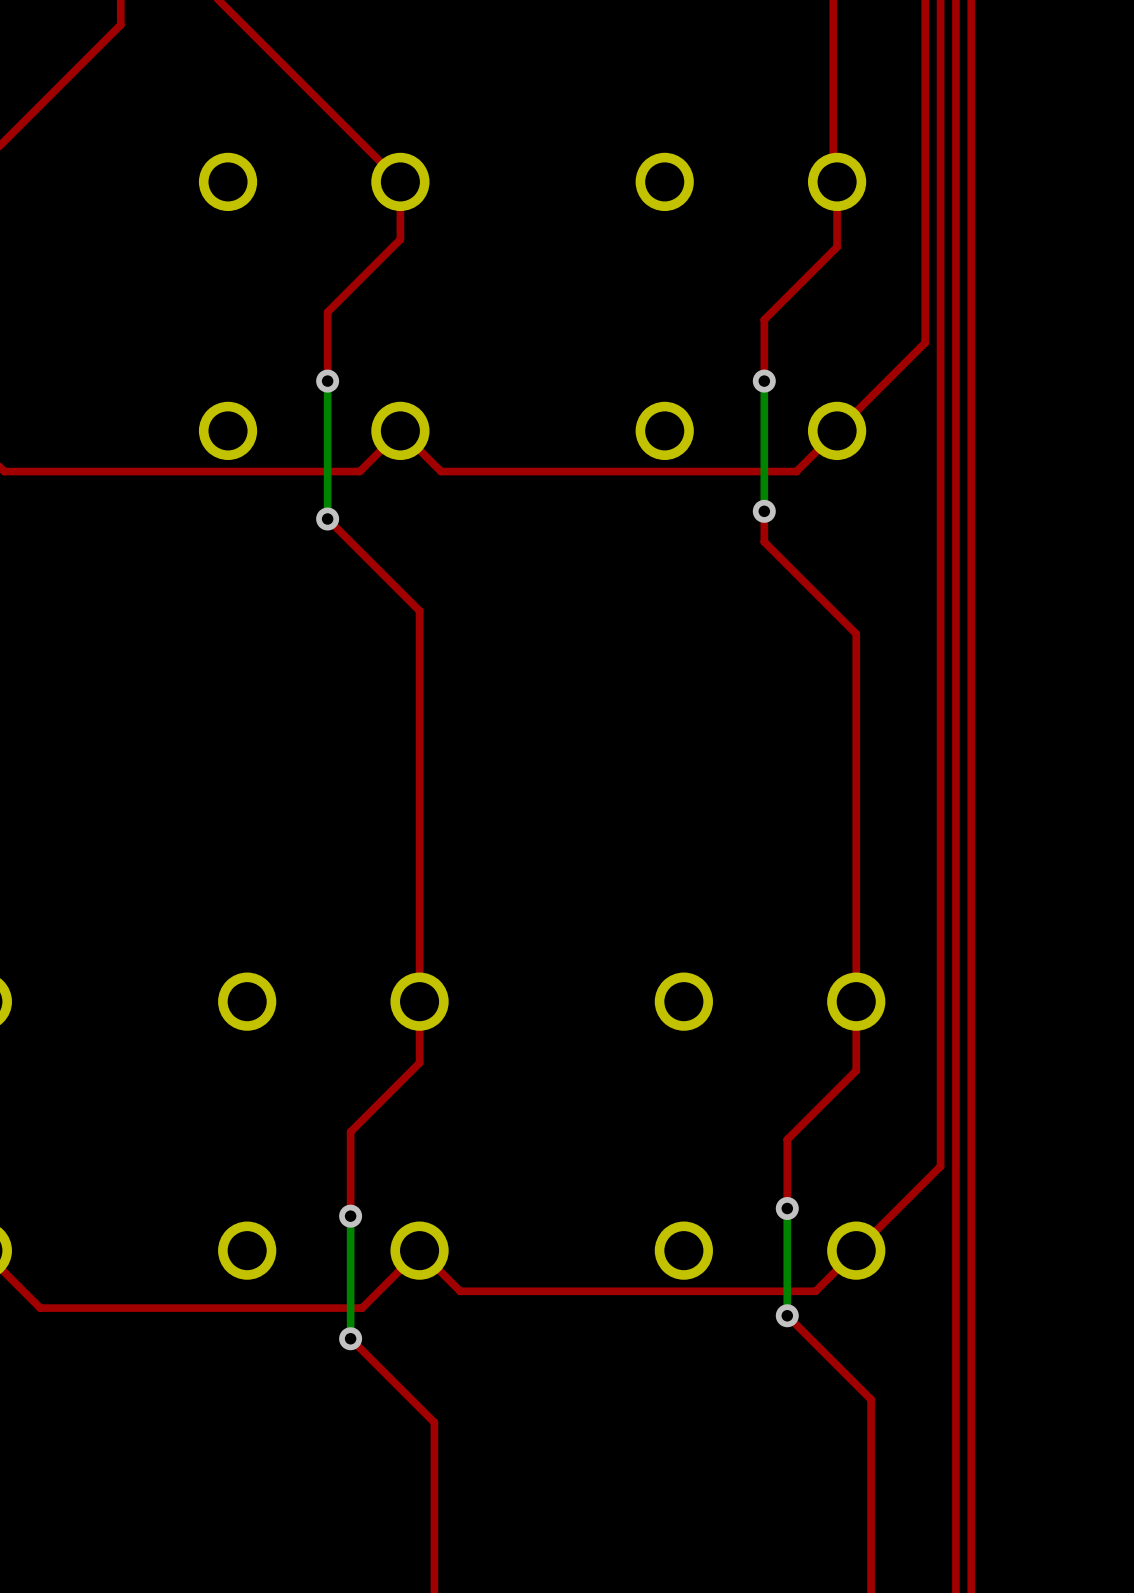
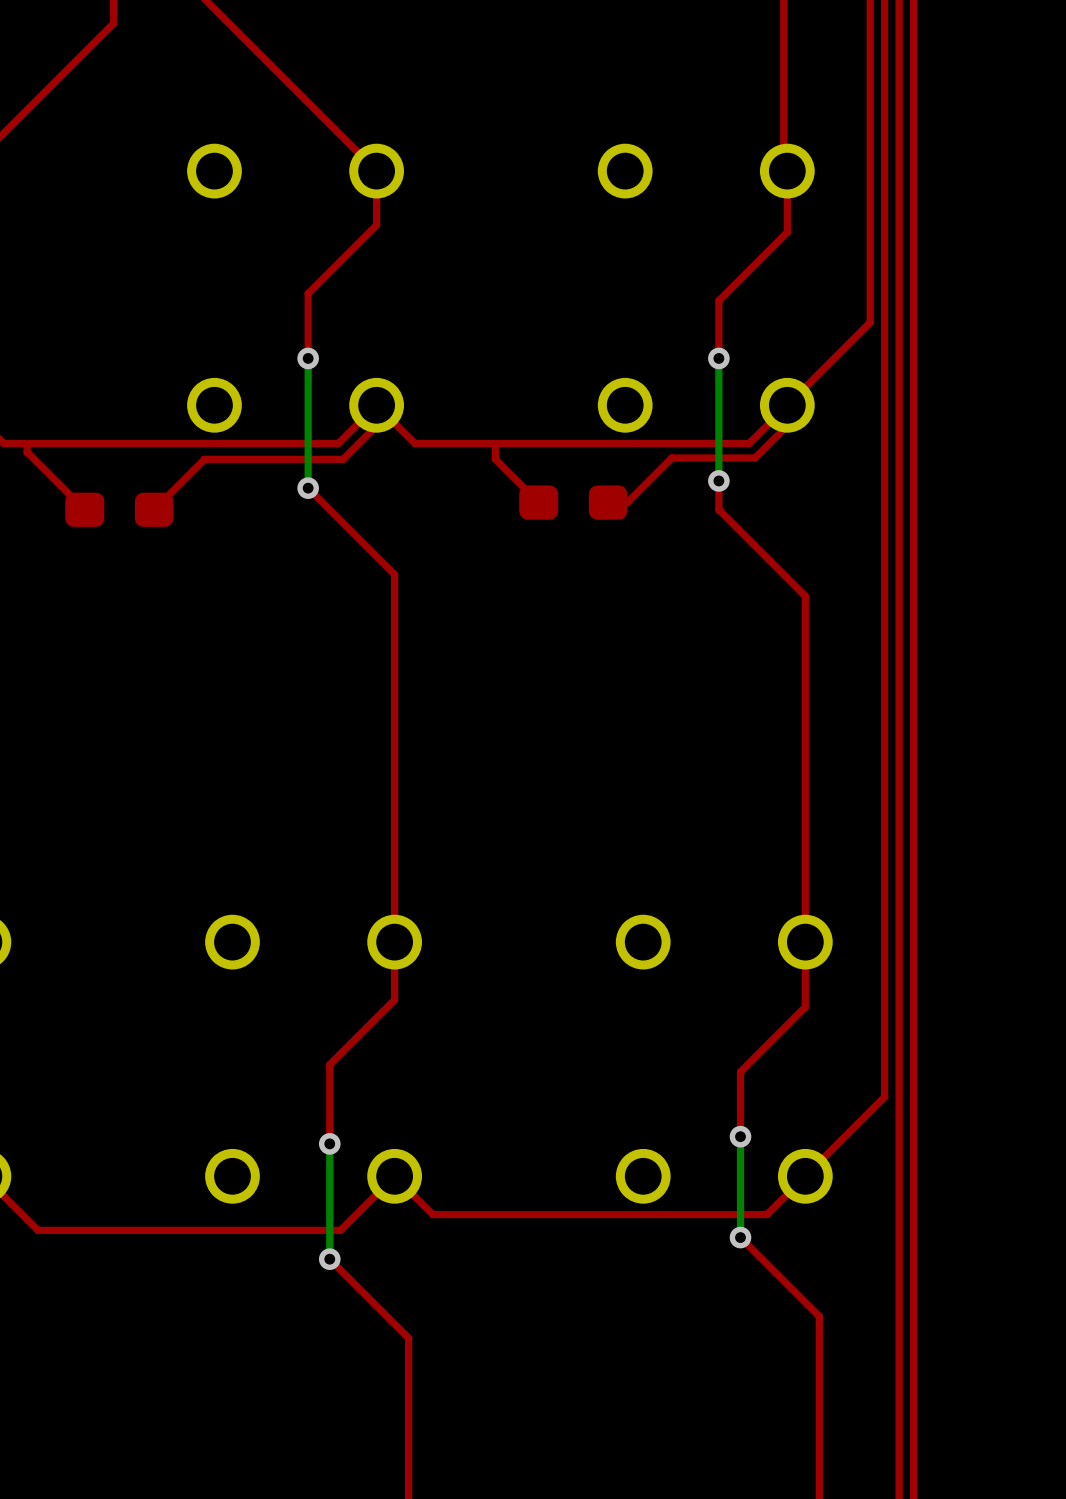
top track: none -> (801, 411) (755, 457) (671, 457) (627, 502) (608, 502)
top track: none -> (376, 425) (342, 459) (204, 459) (154, 509)
top track: none -> (27, 443) (27, 452) (84, 509)
top track: none -> (495, 443) (495, 459) (538, 502)
part: none -> (573, 502)
part: none -> (119, 509)

